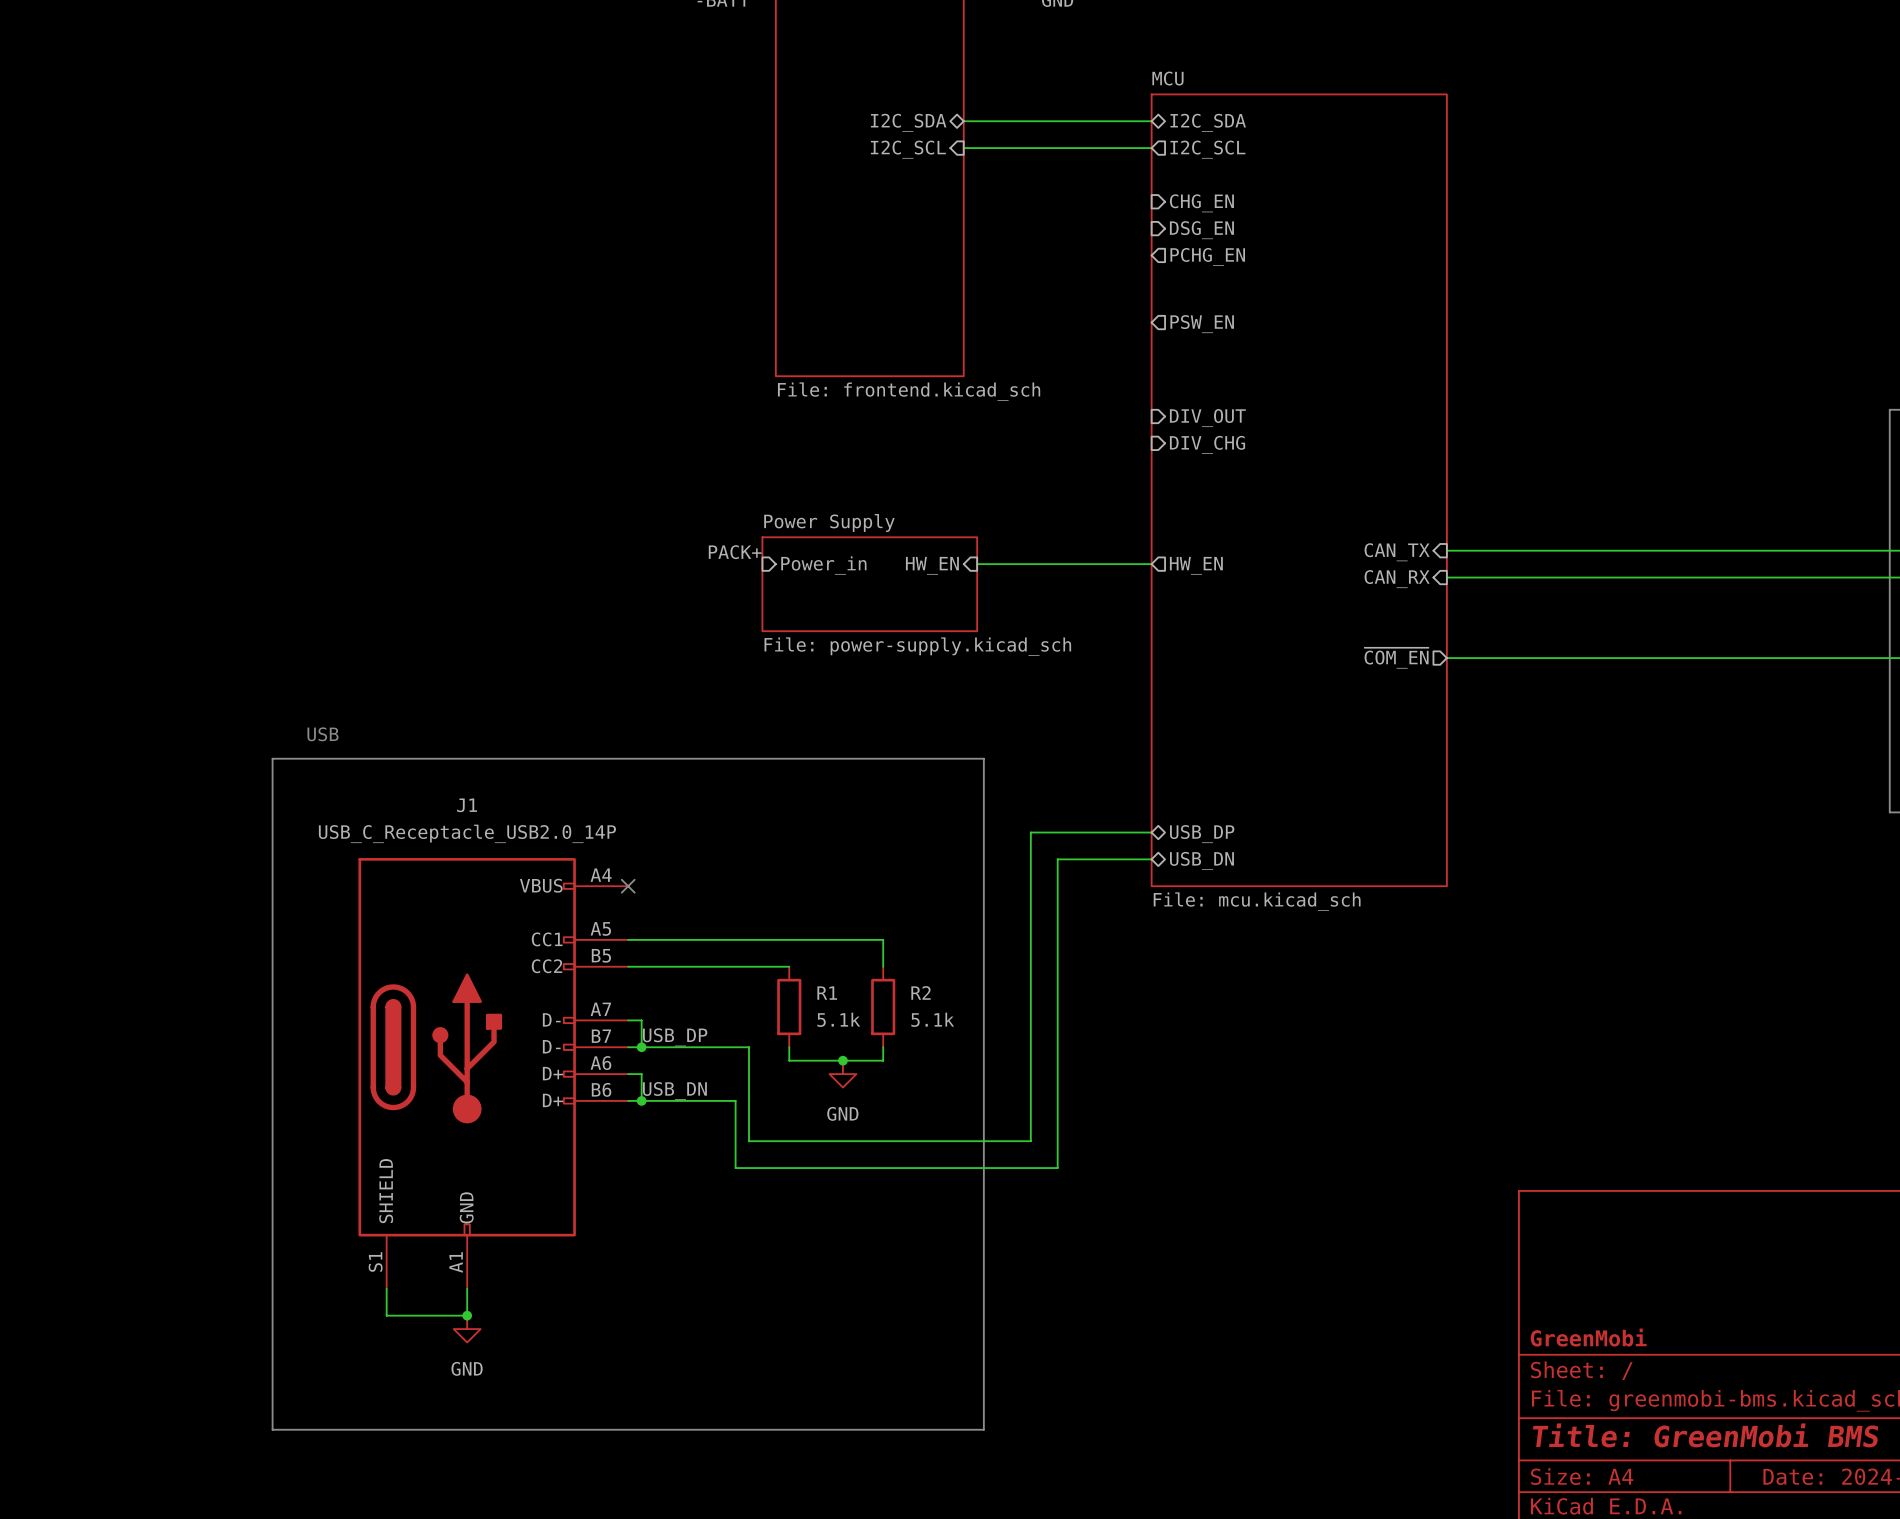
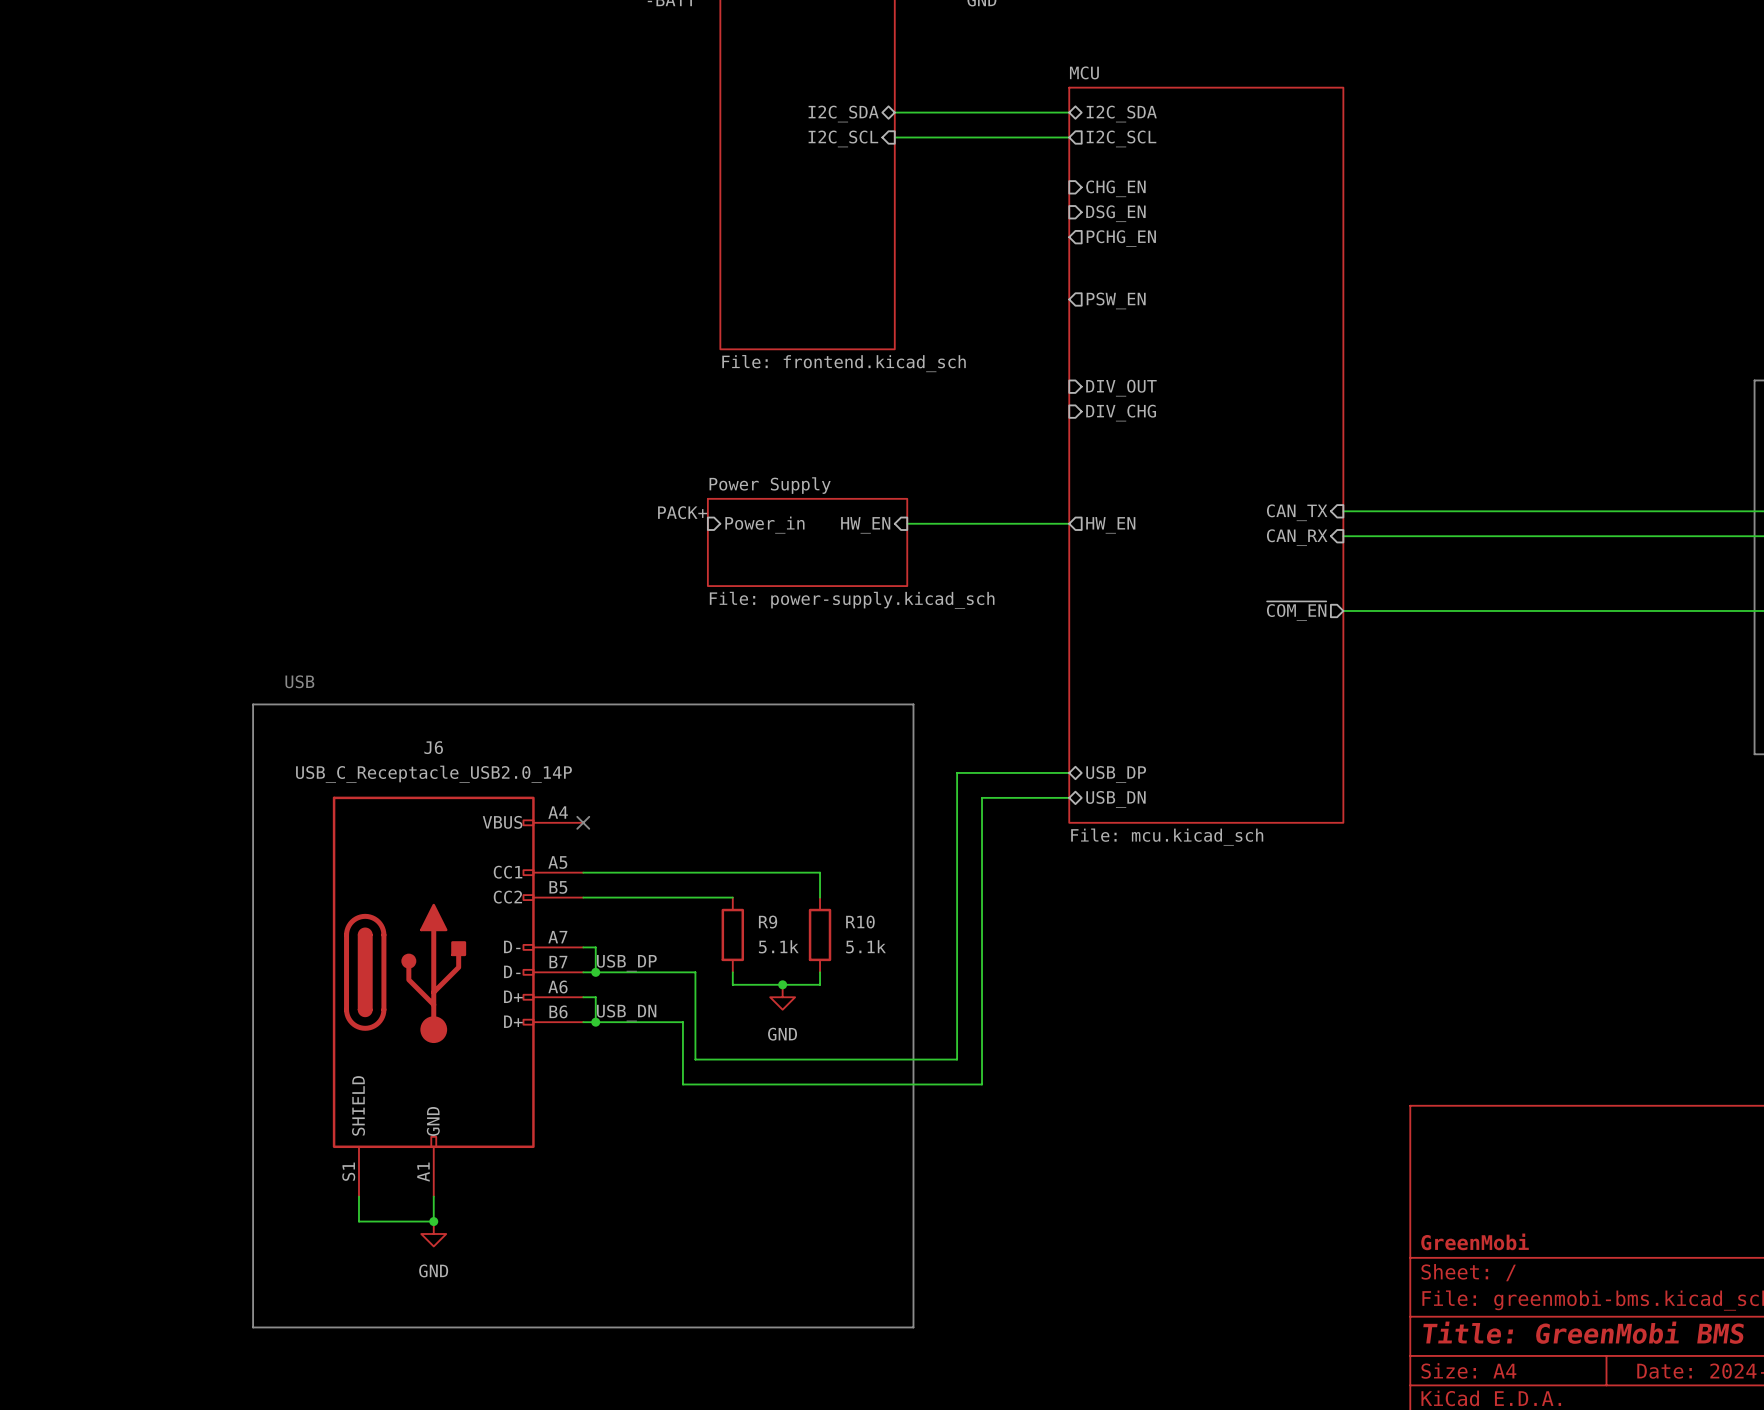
J1 name: J1 (467, 805) -> J6 (433, 747)
R2 name: R2 (921, 992) -> R10 (860, 922)
R1 name: R1 (827, 993) -> R9 (768, 922)

